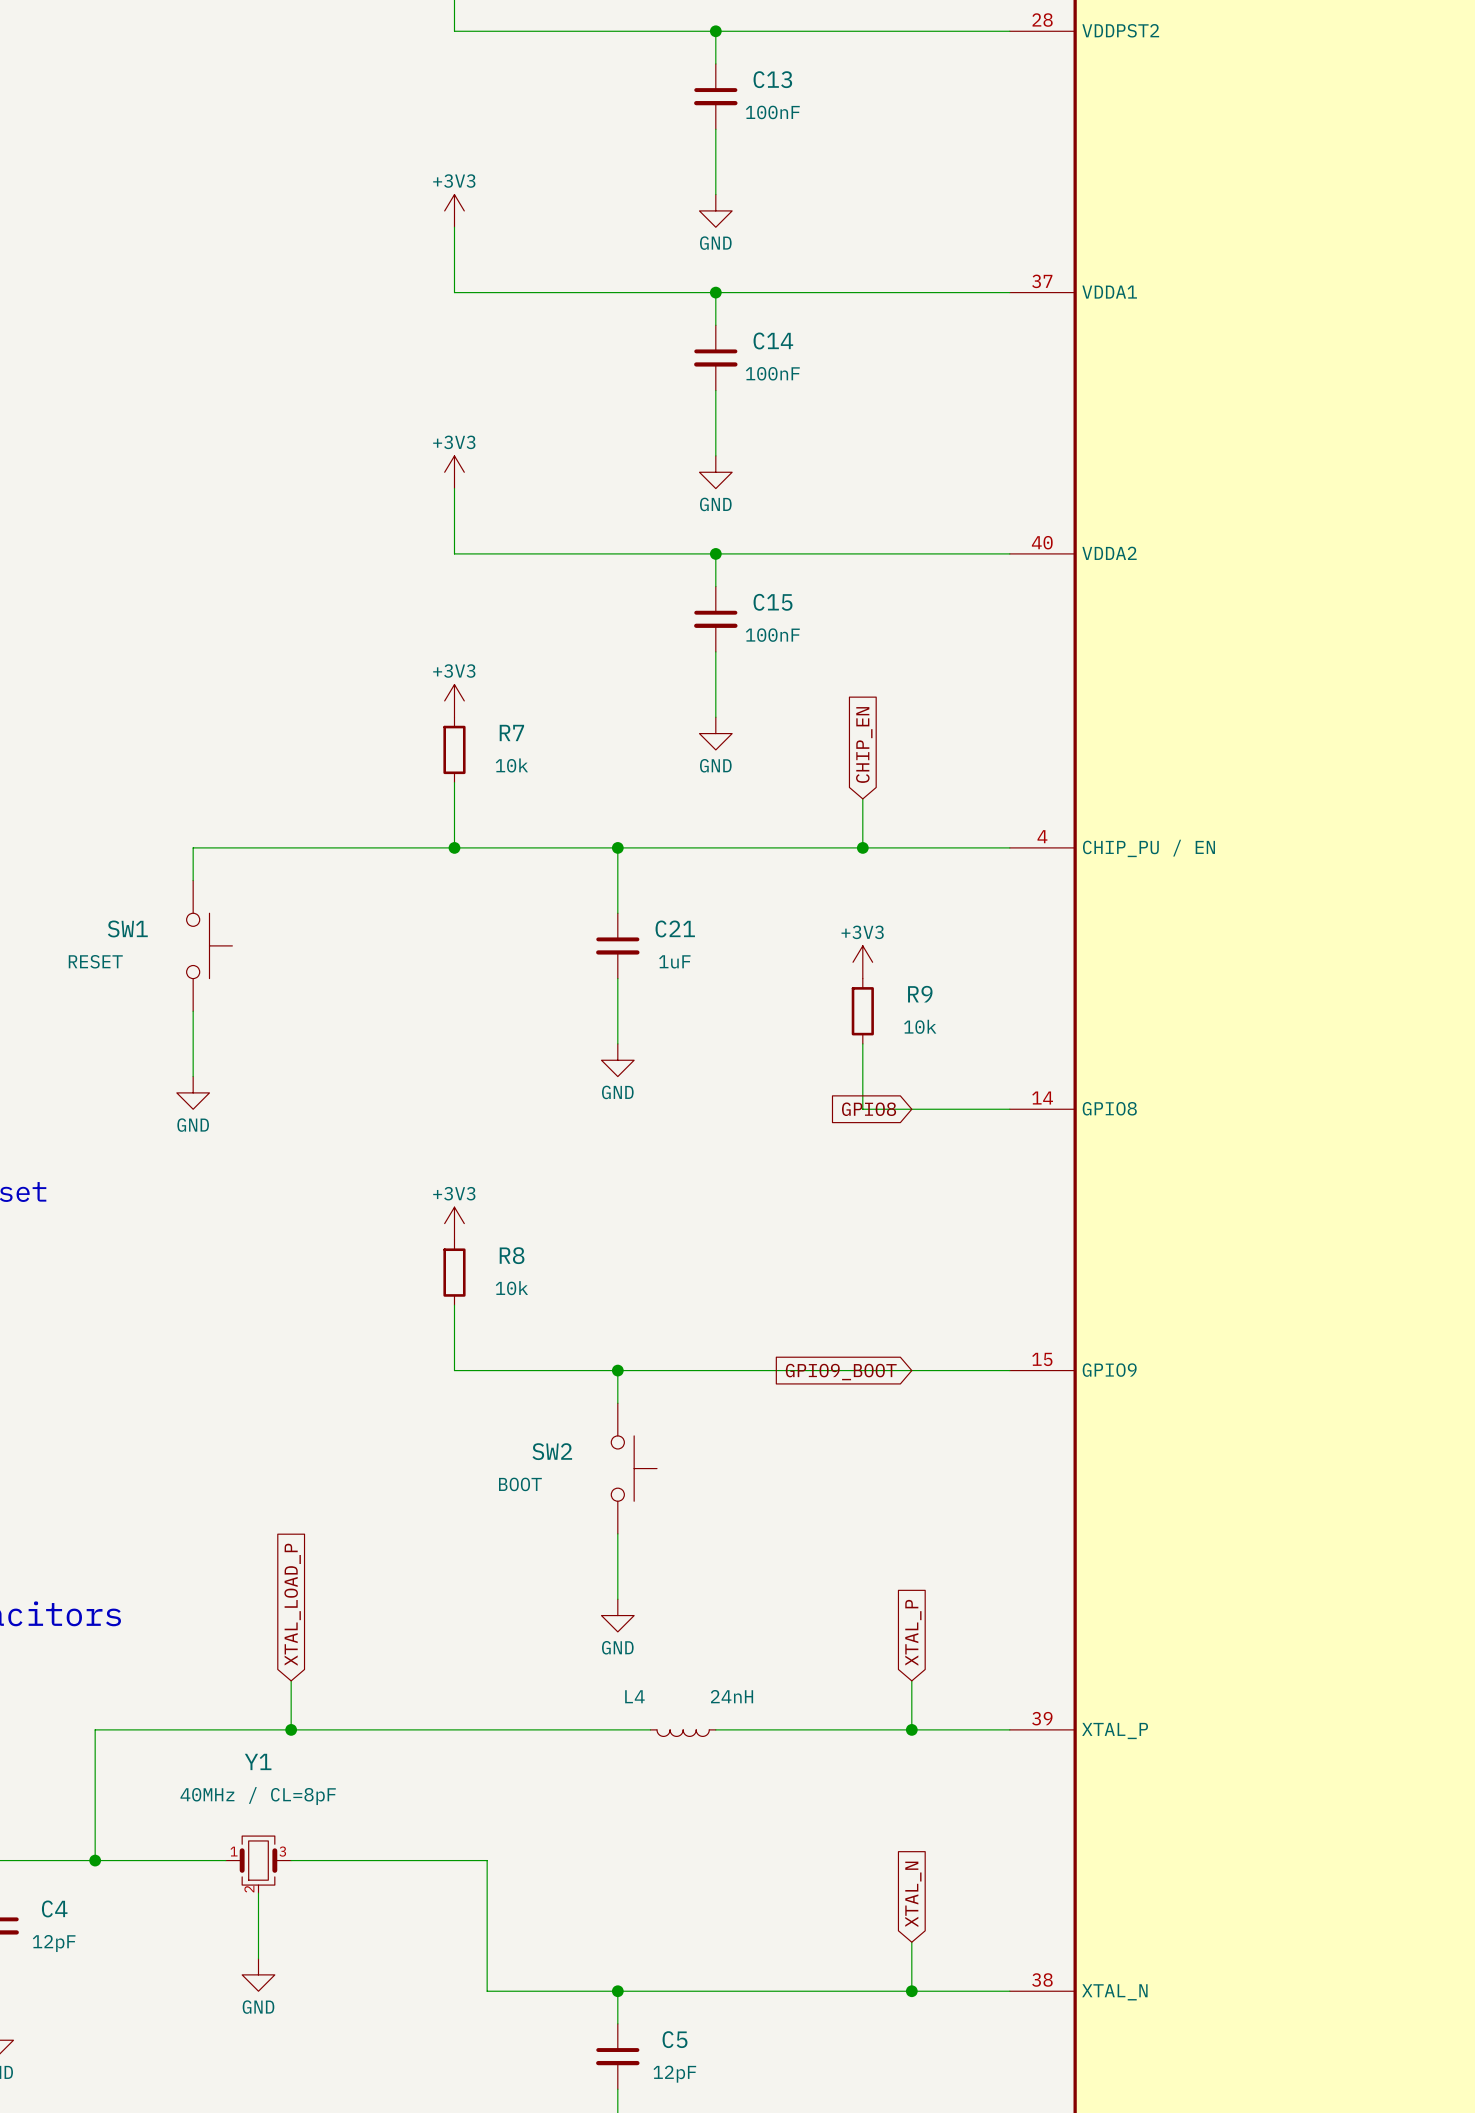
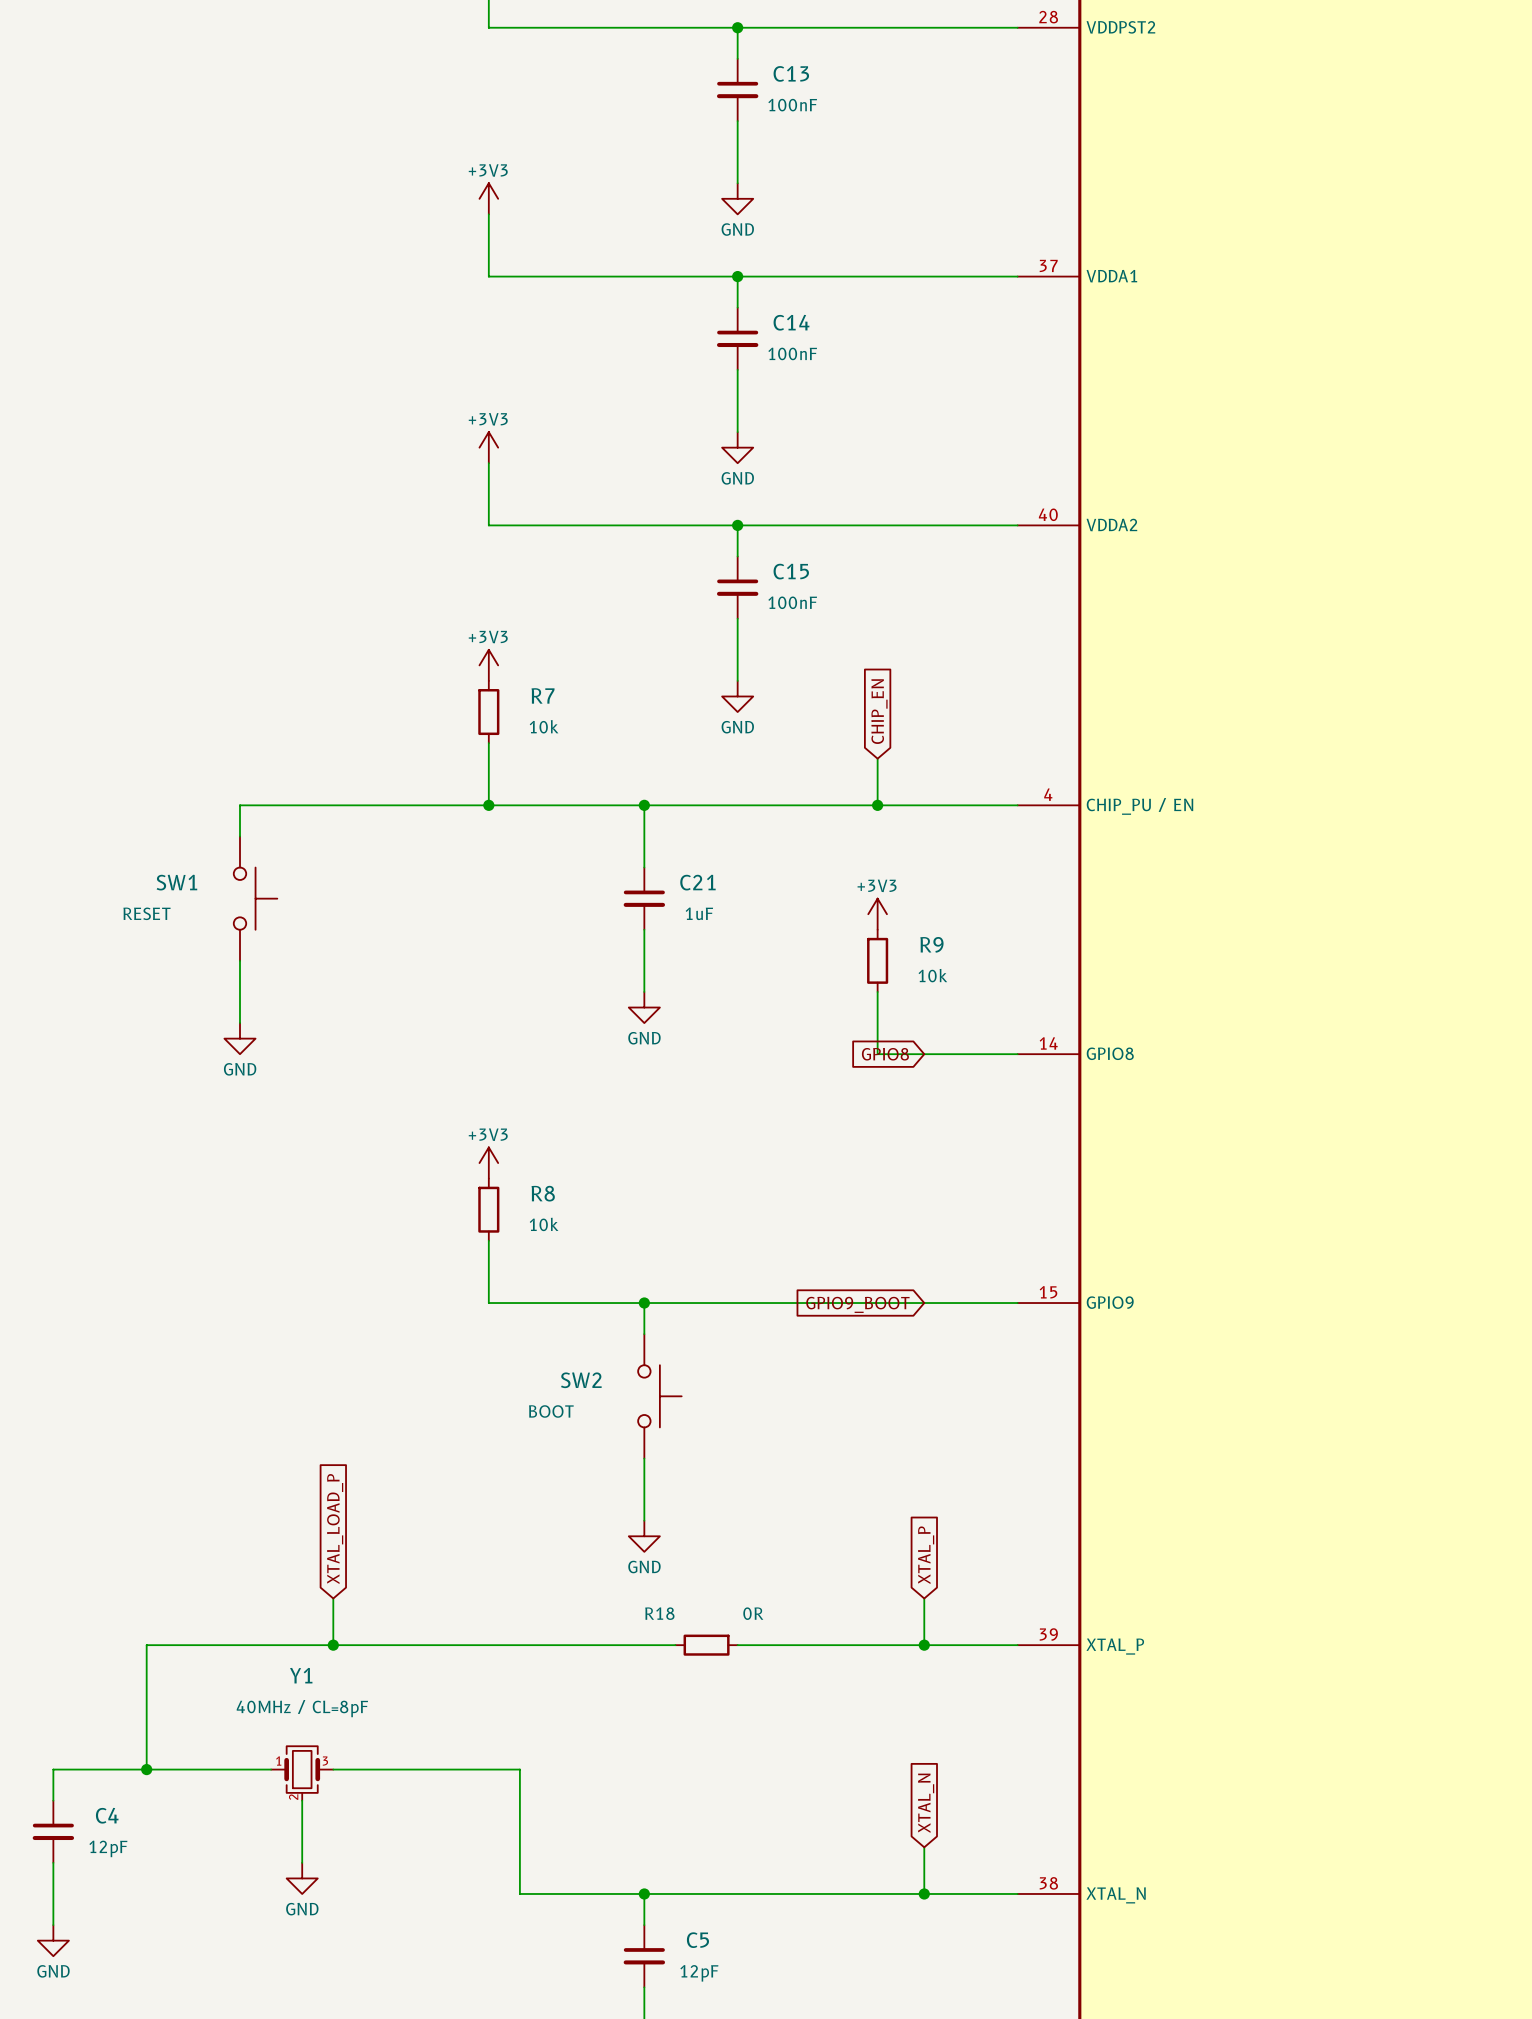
R18: none -> 0R (706, 1645)
L4: 24nH (683, 1733) -> none

